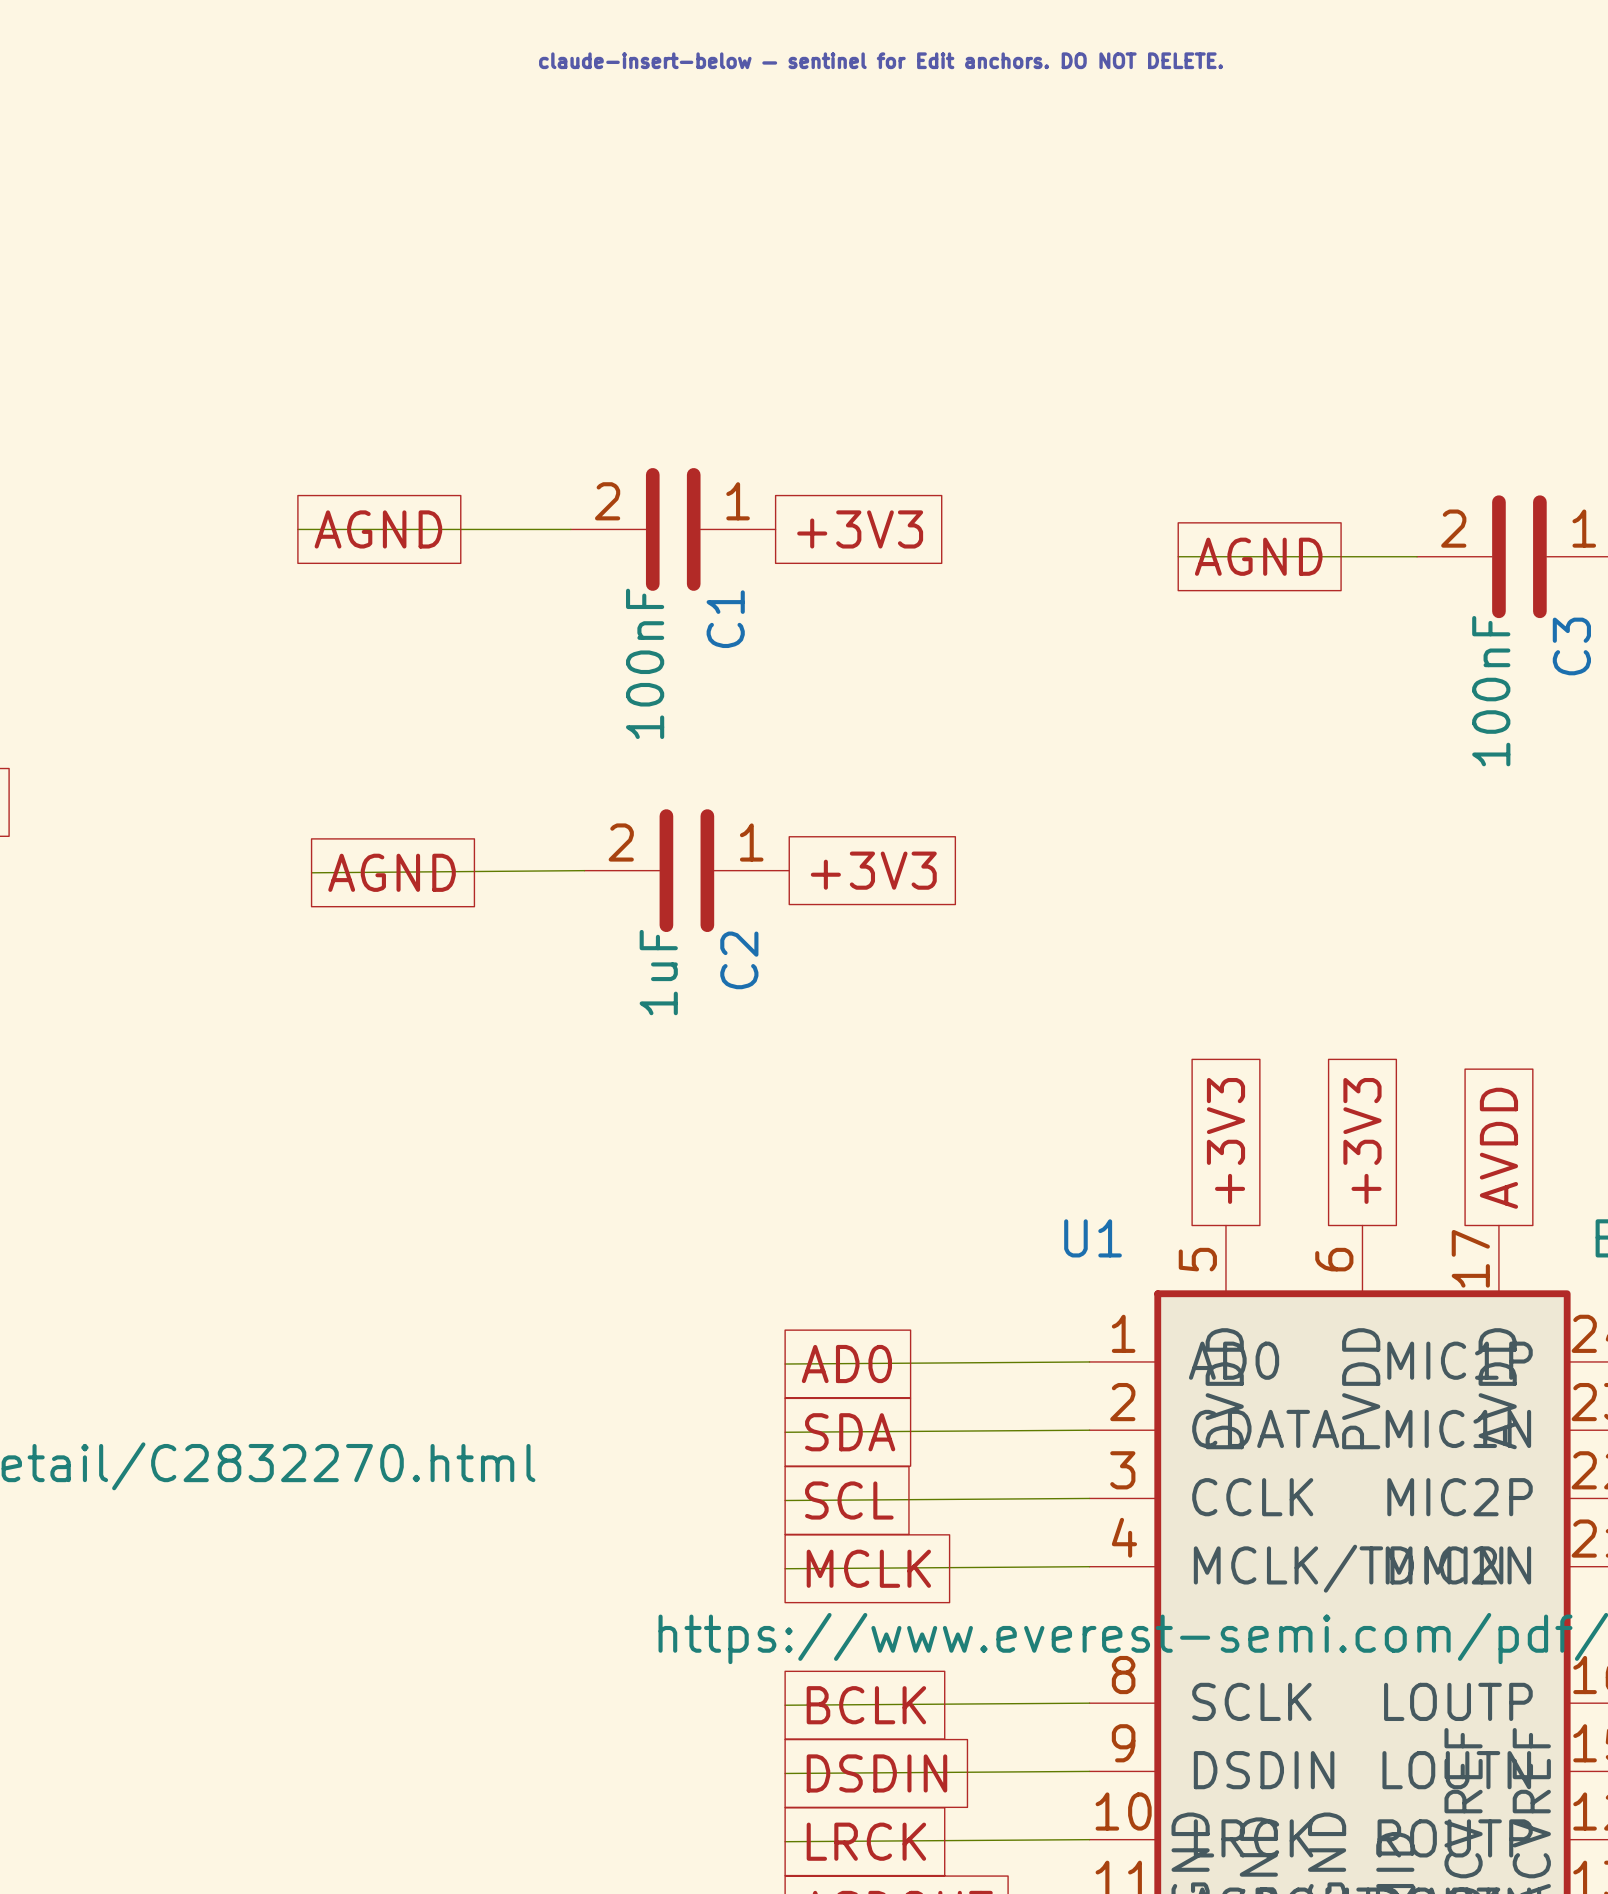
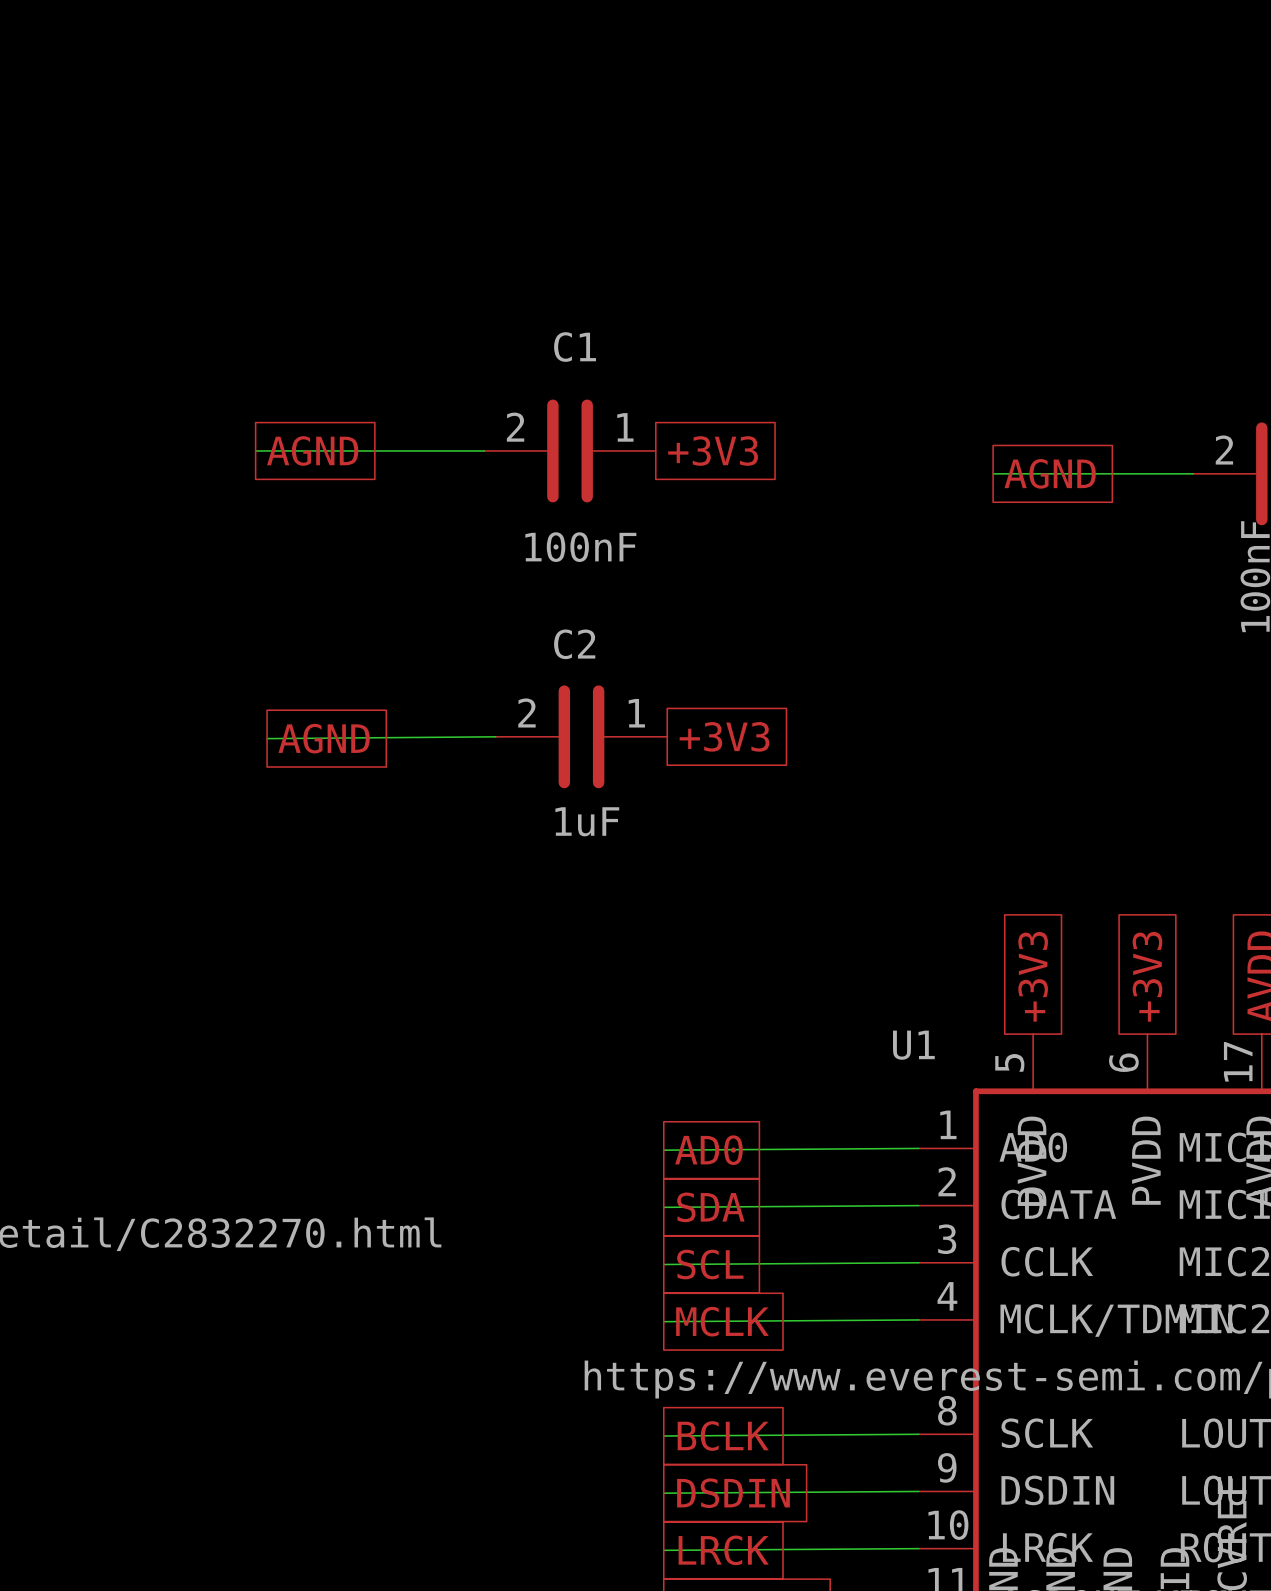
text: claude-insert-below — sentinel for Edit anchors. DO NOT DELETE. (881, 60) -> none
C1 name rotation: 0° (725, 619) -> 90° clockwise (575, 347)
C1 name position: C1 (725, 619) -> C1 (575, 347)
C1 value rotation: 0° (645, 663) -> 90° clockwise (580, 547)
C2 name rotation: 0° (739, 960) -> 90° clockwise (574, 644)
C2 name position: C2 (739, 960) -> C2 (574, 644)
C2 value rotation: 0° (658, 972) -> 90° clockwise (587, 821)

